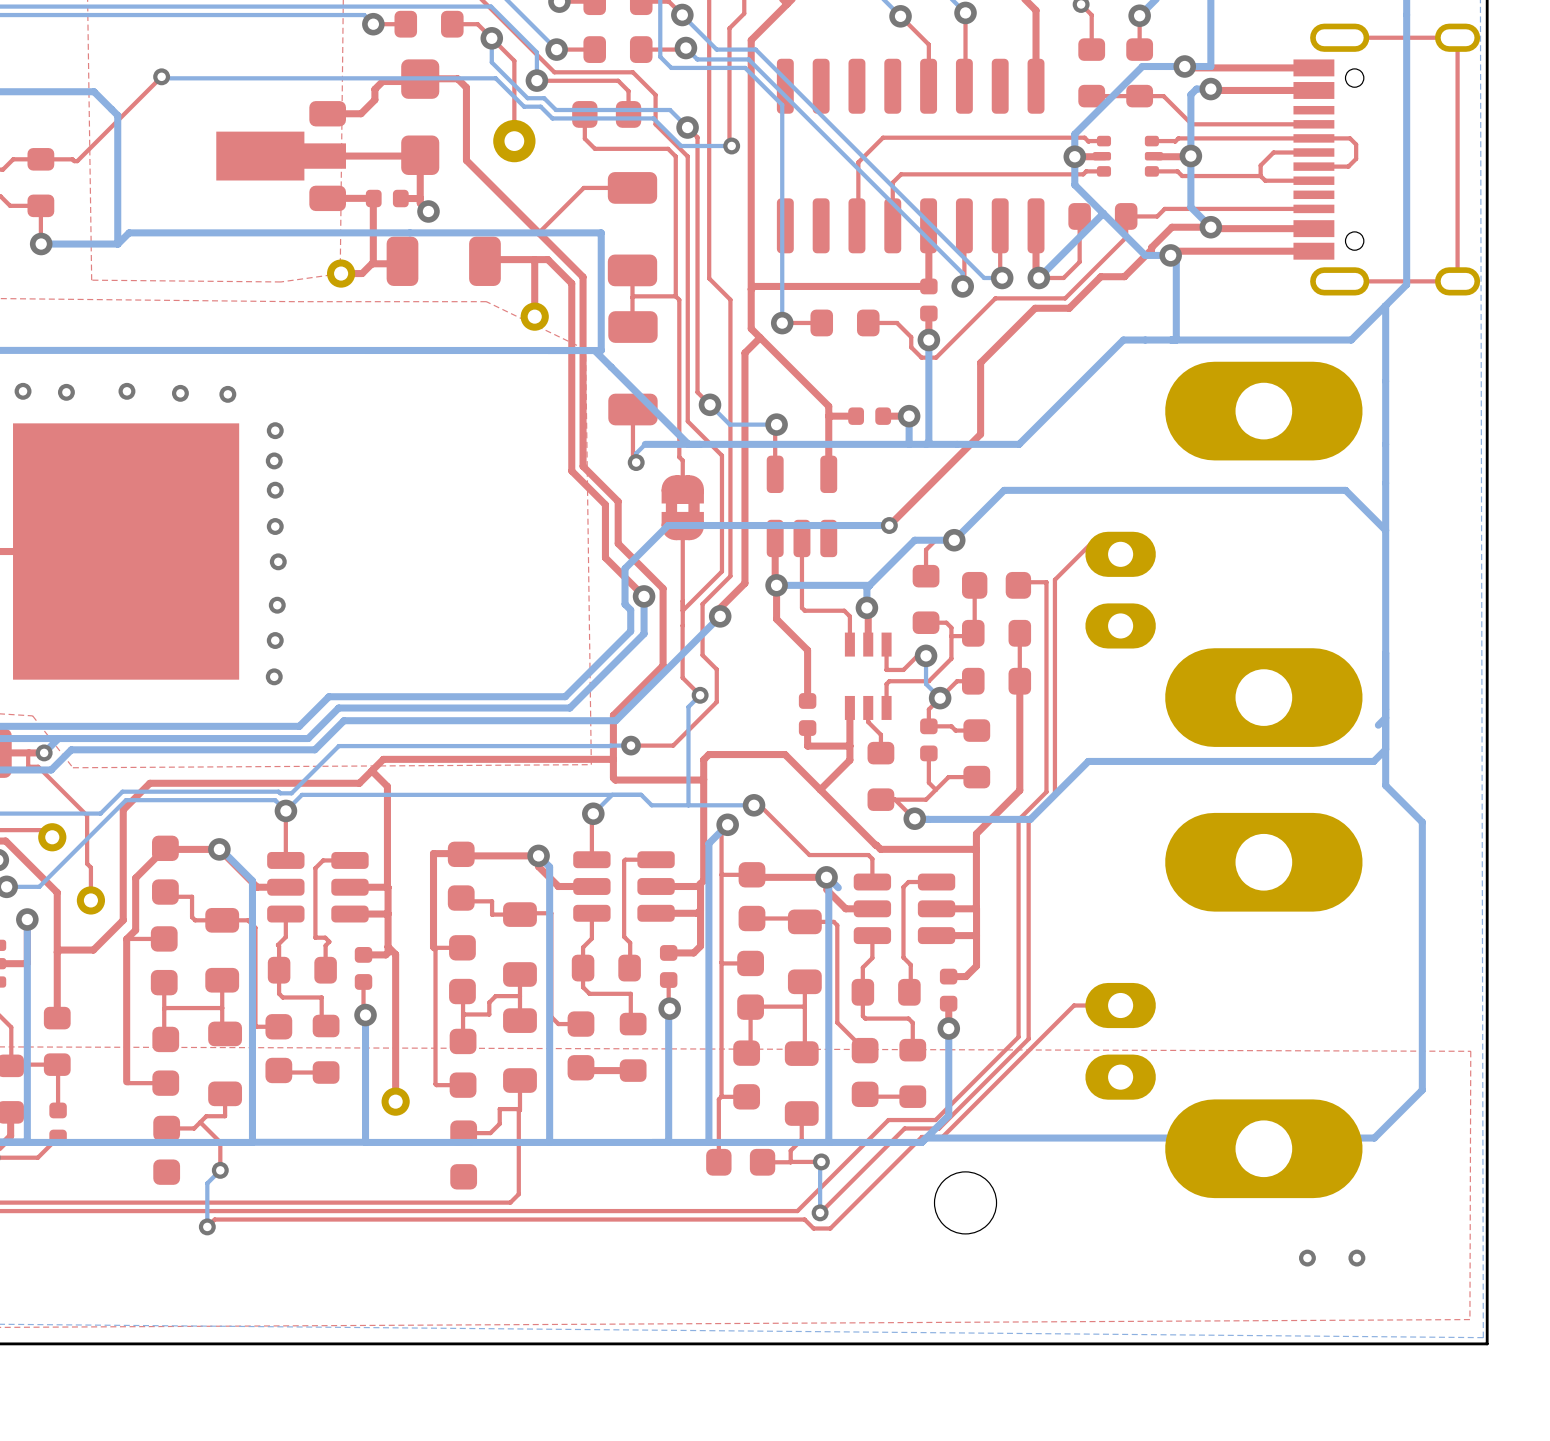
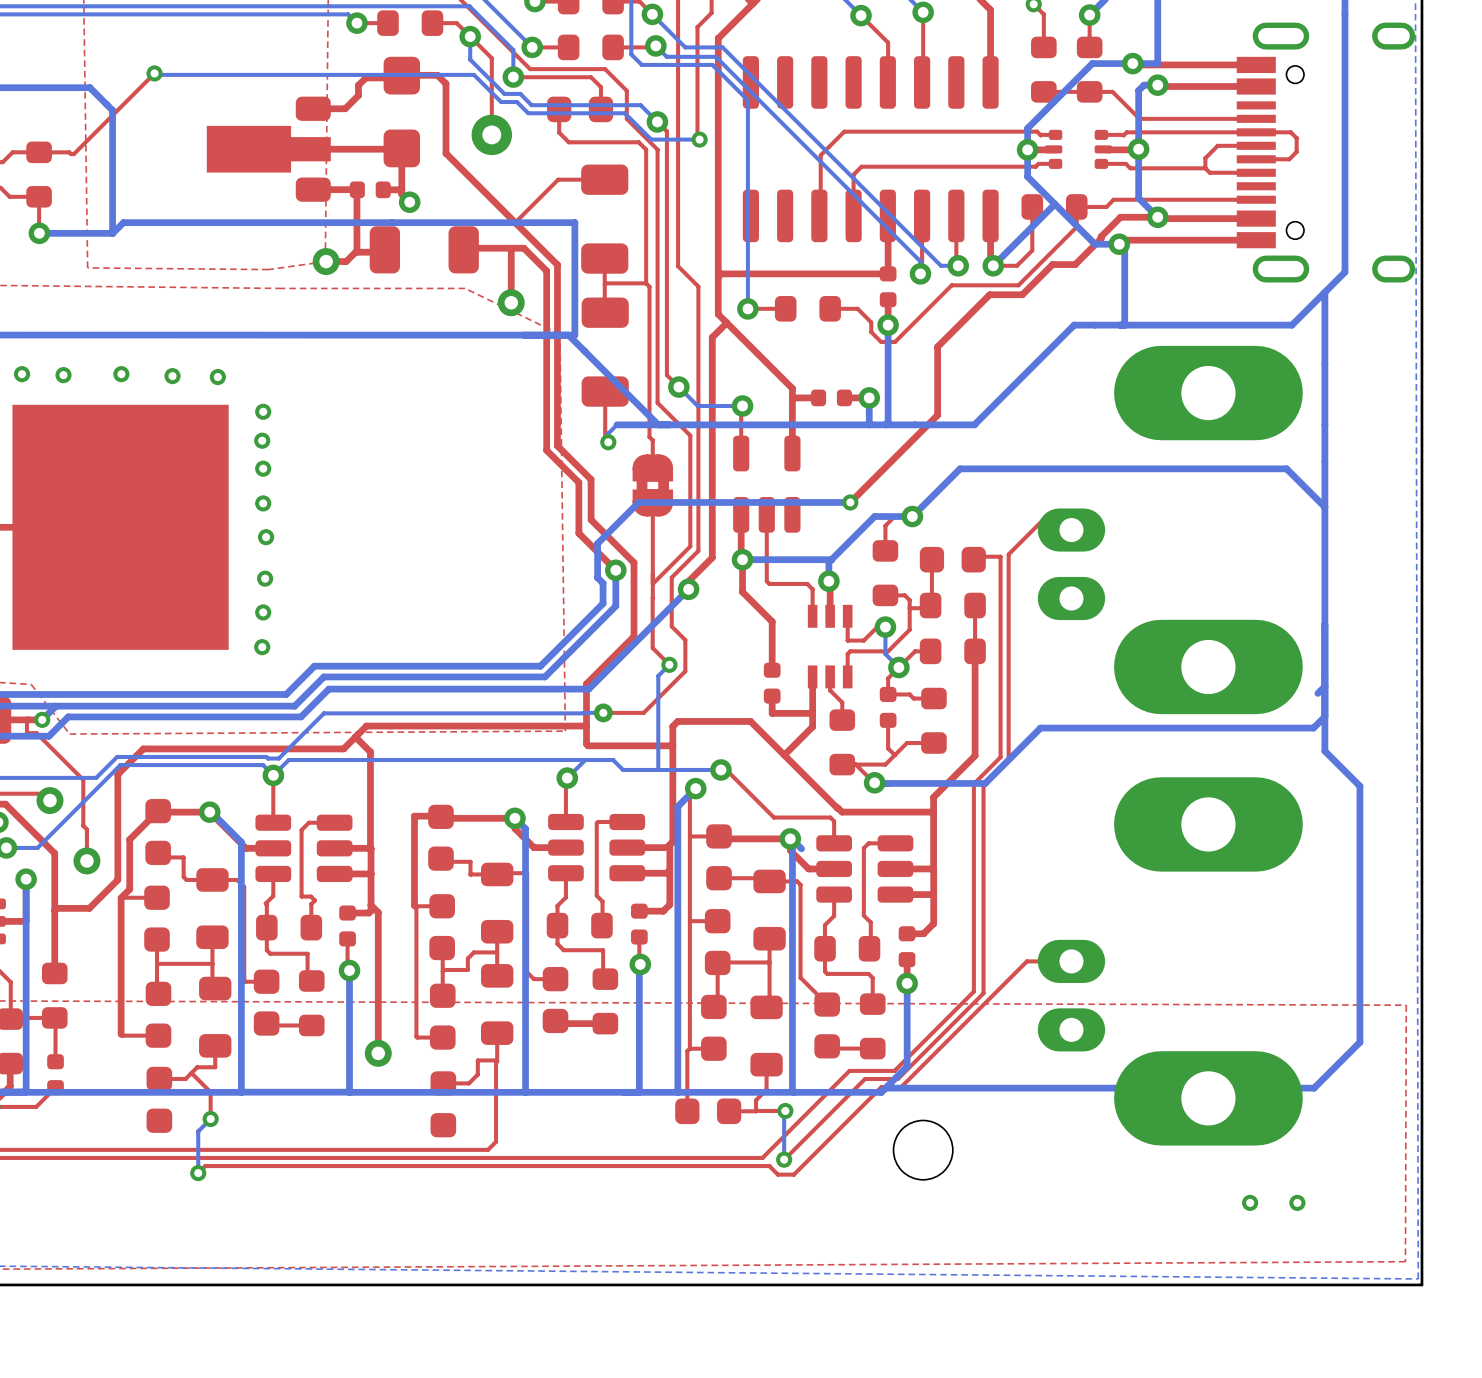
top track: (1339, 37) (1457, 37) (1457, 281) (1339, 281) -> none

